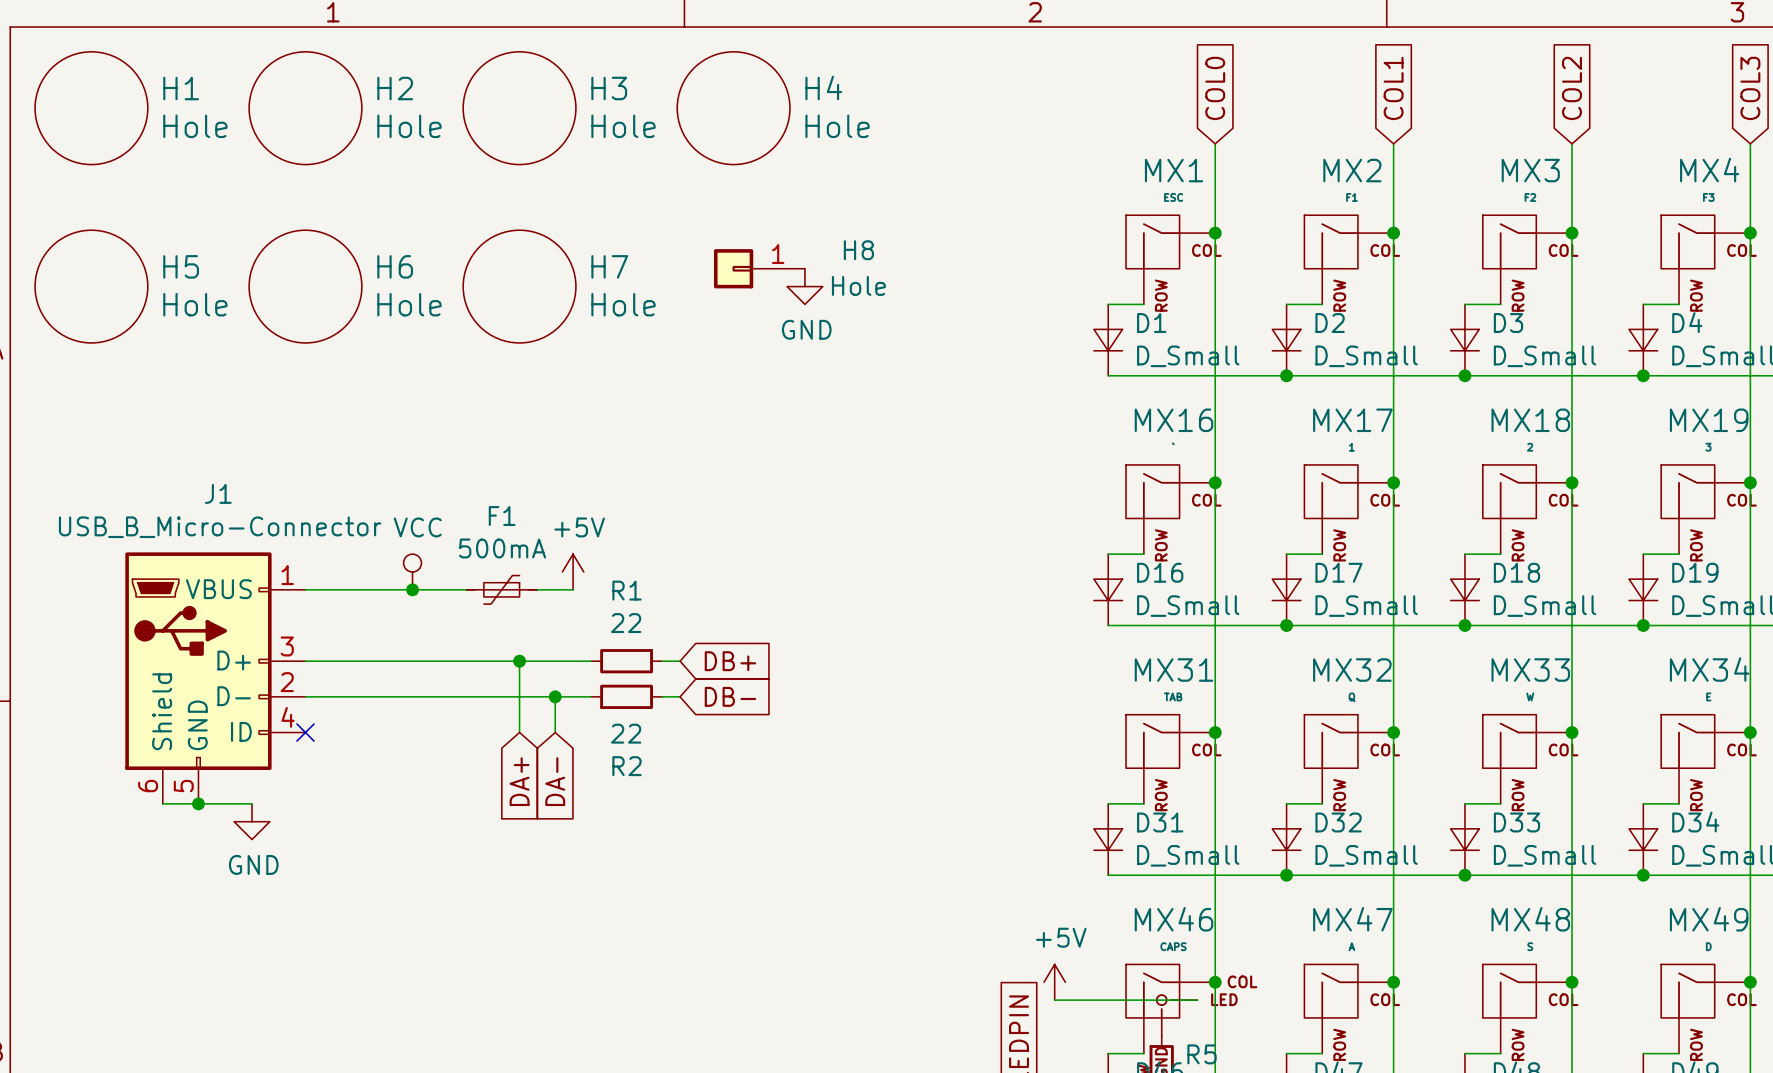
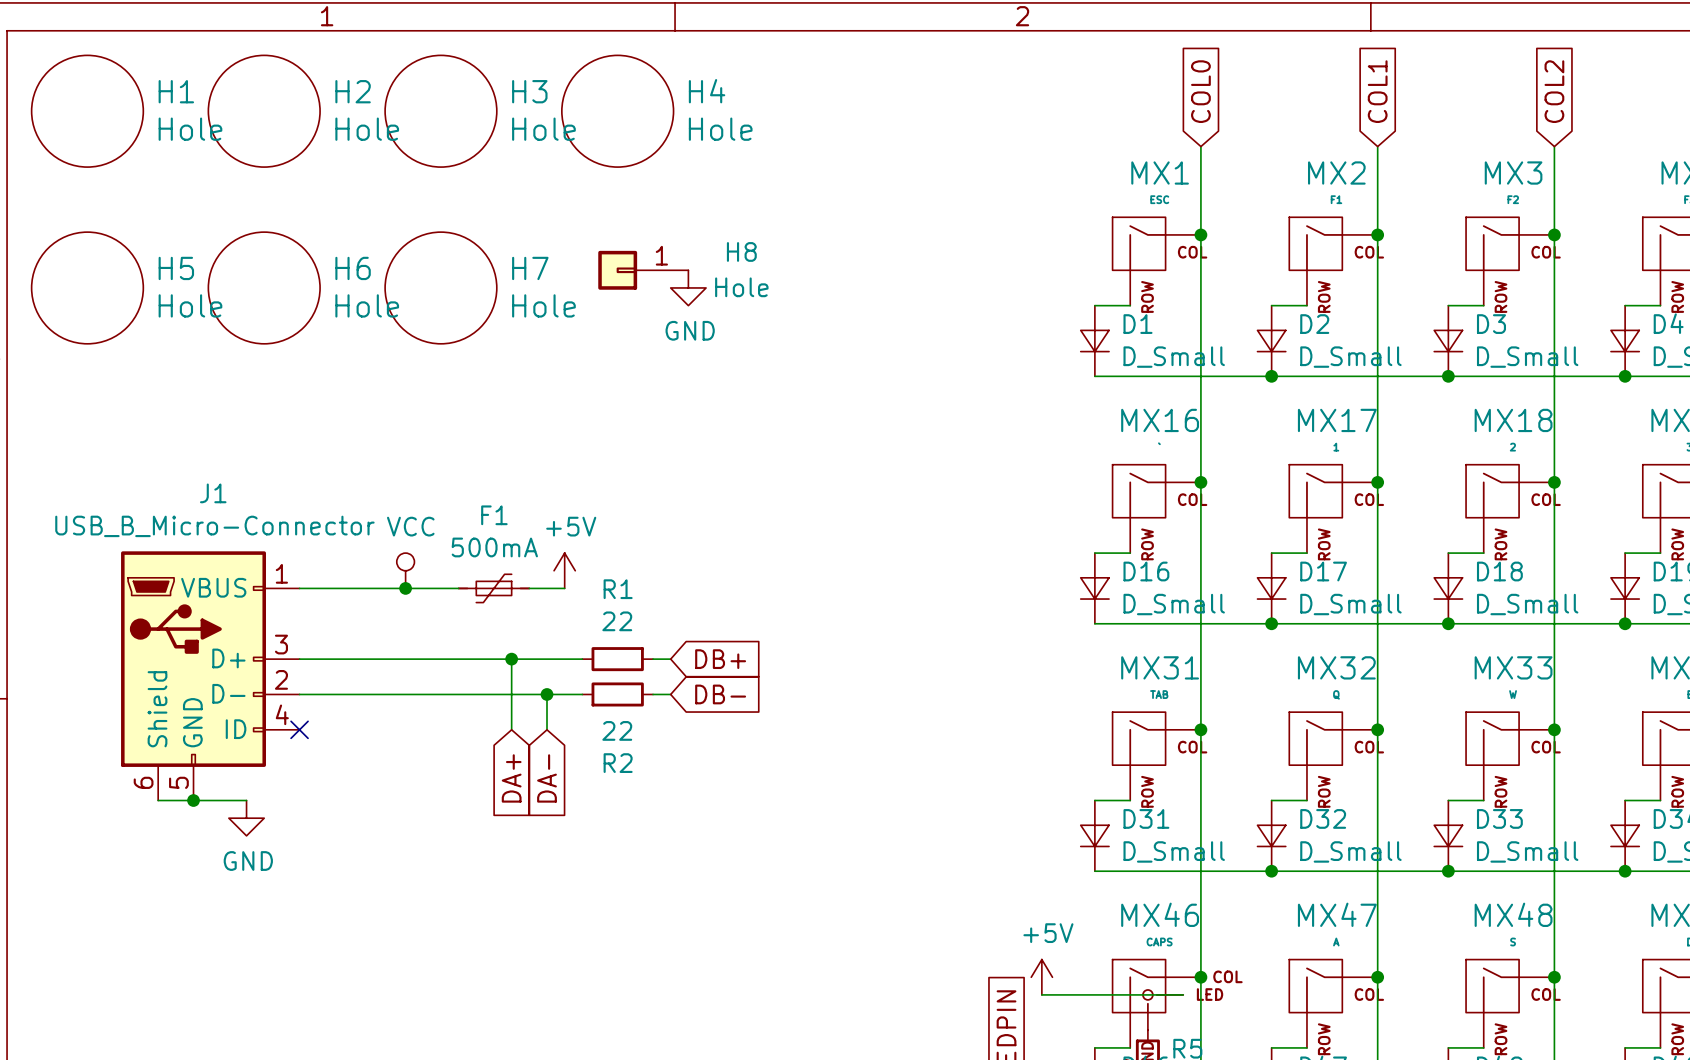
H2 position: (305, 108) -> (264, 111)
H3 position: (519, 108) -> (440, 111)
H4 position: (733, 108) -> (617, 111)
H8 position: (759, 268) -> (643, 270)
H6 position: (305, 286) -> (264, 287)
H7 position: (519, 286) -> (440, 287)
power symbol position: GND (804, 286) -> GND (688, 287)

